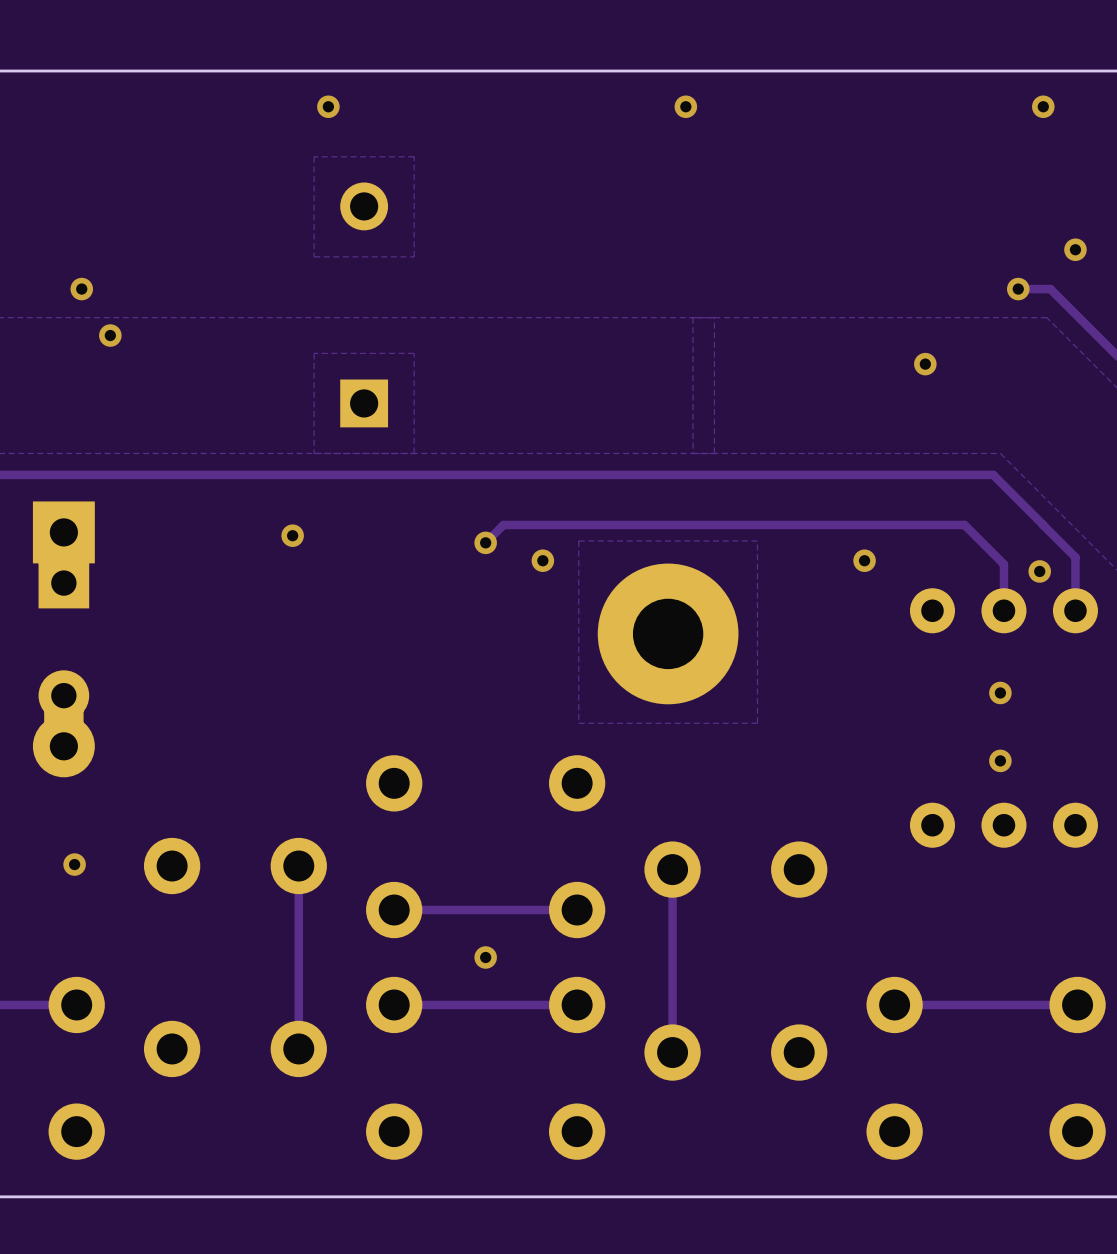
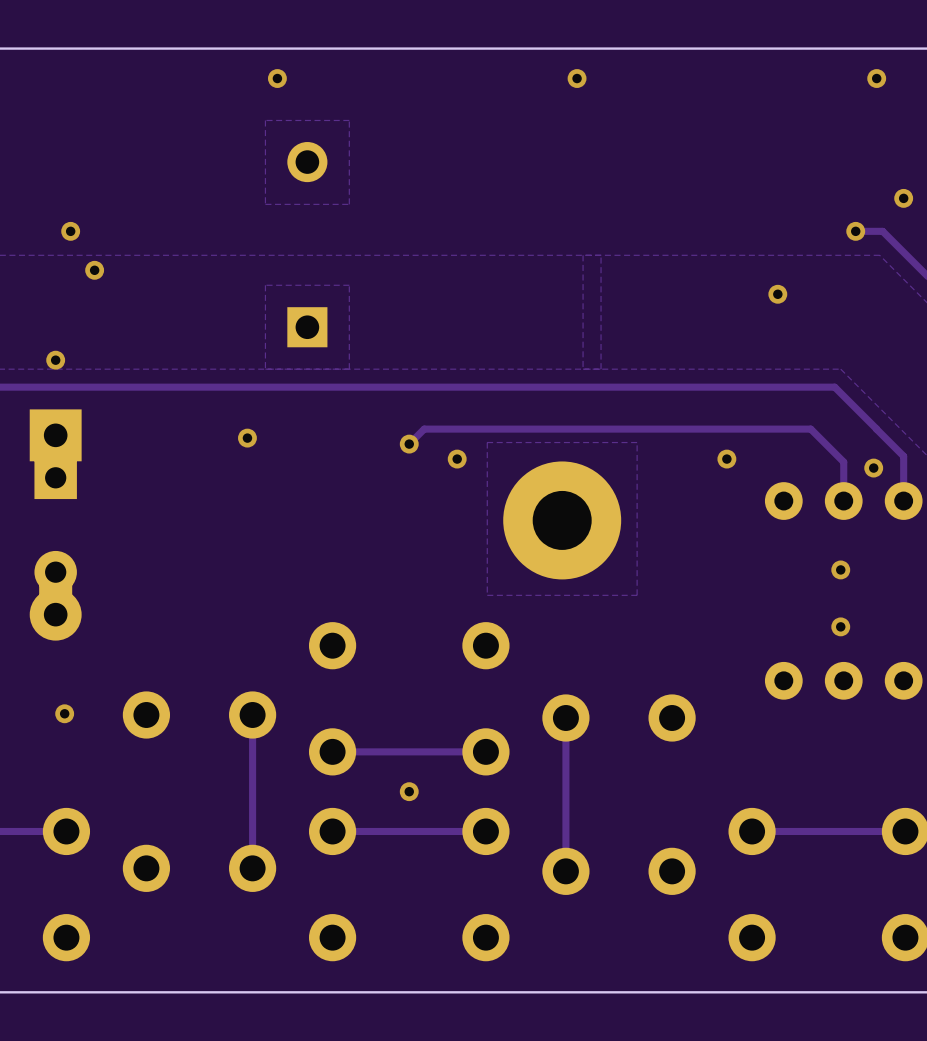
via: none -> (55, 360)

